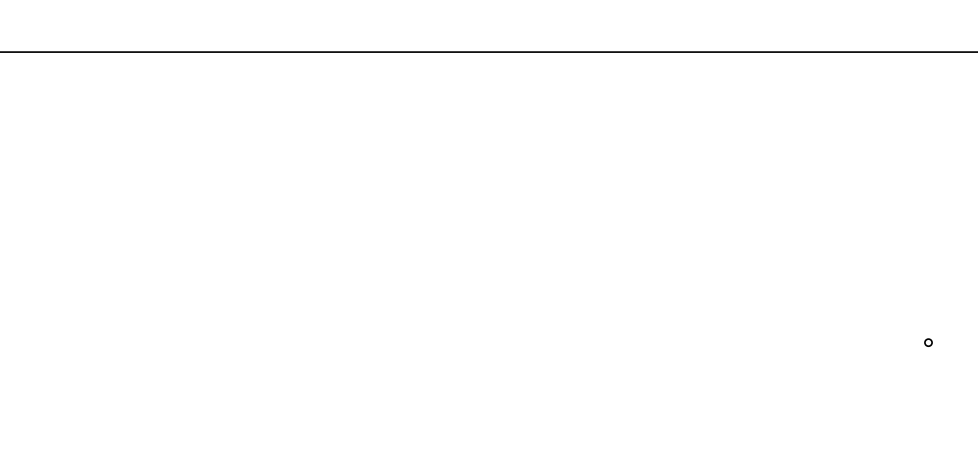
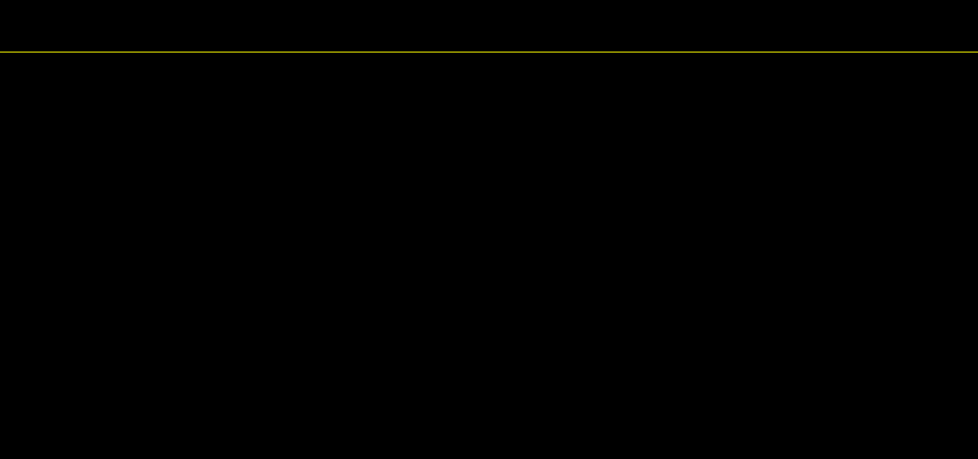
hole: (928, 342) -> none

